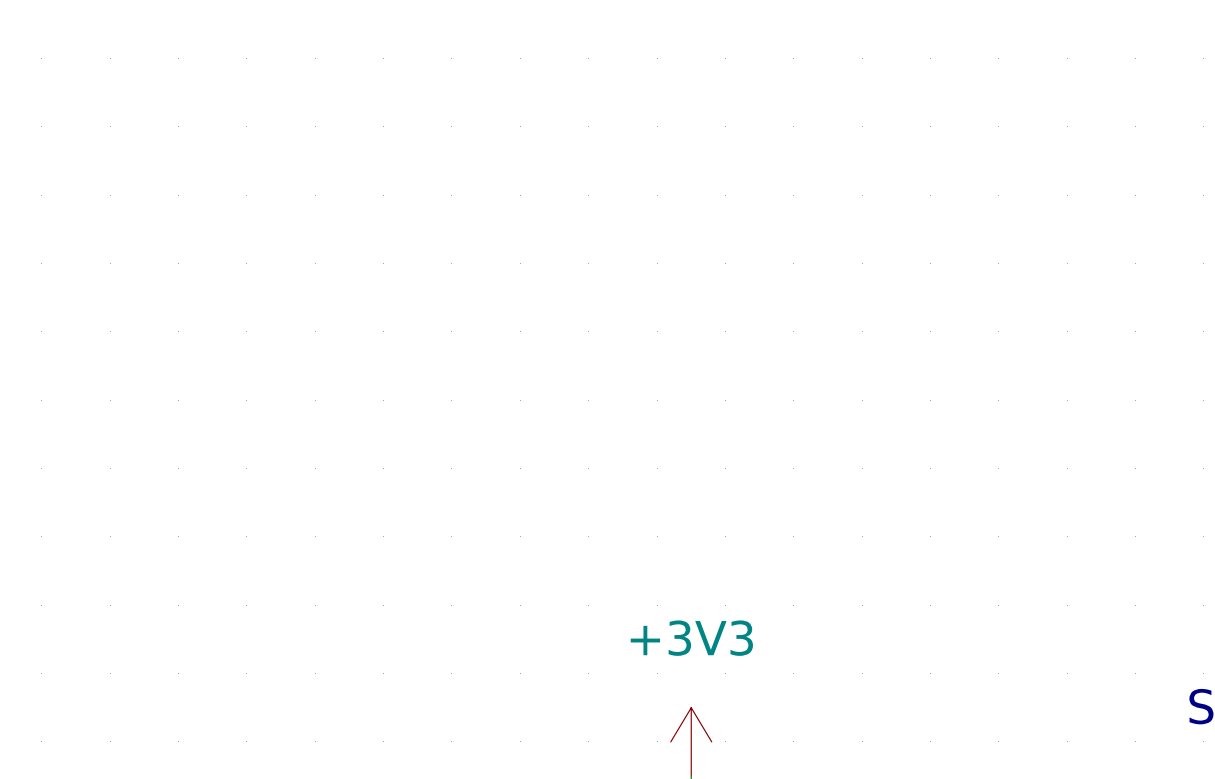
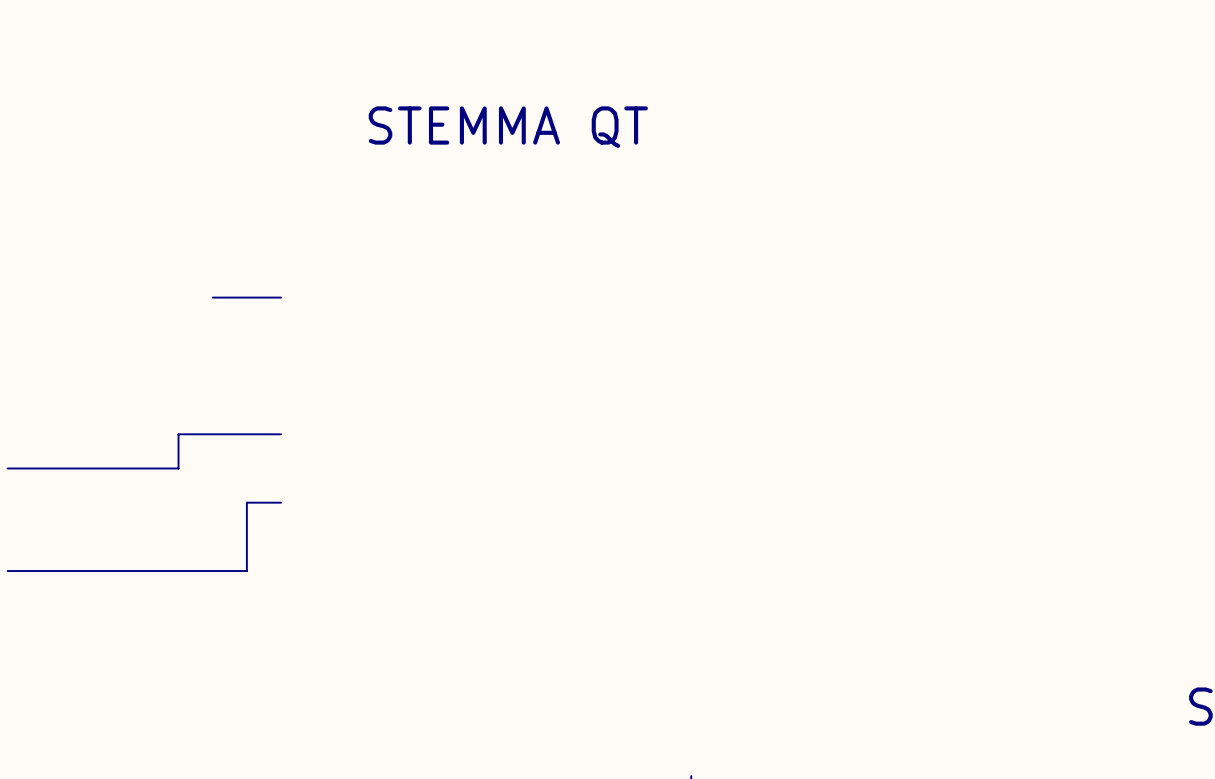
text: none -> STEMMA QT (508, 127)
wire: none -> (212, 297) (281, 297)
wire: none -> (281, 434) (178, 434) (178, 468) (7, 468)
wire: none -> (281, 502) (246, 502) (246, 571) (7, 571)
power symbol: +3V3 (691, 741) -> none

